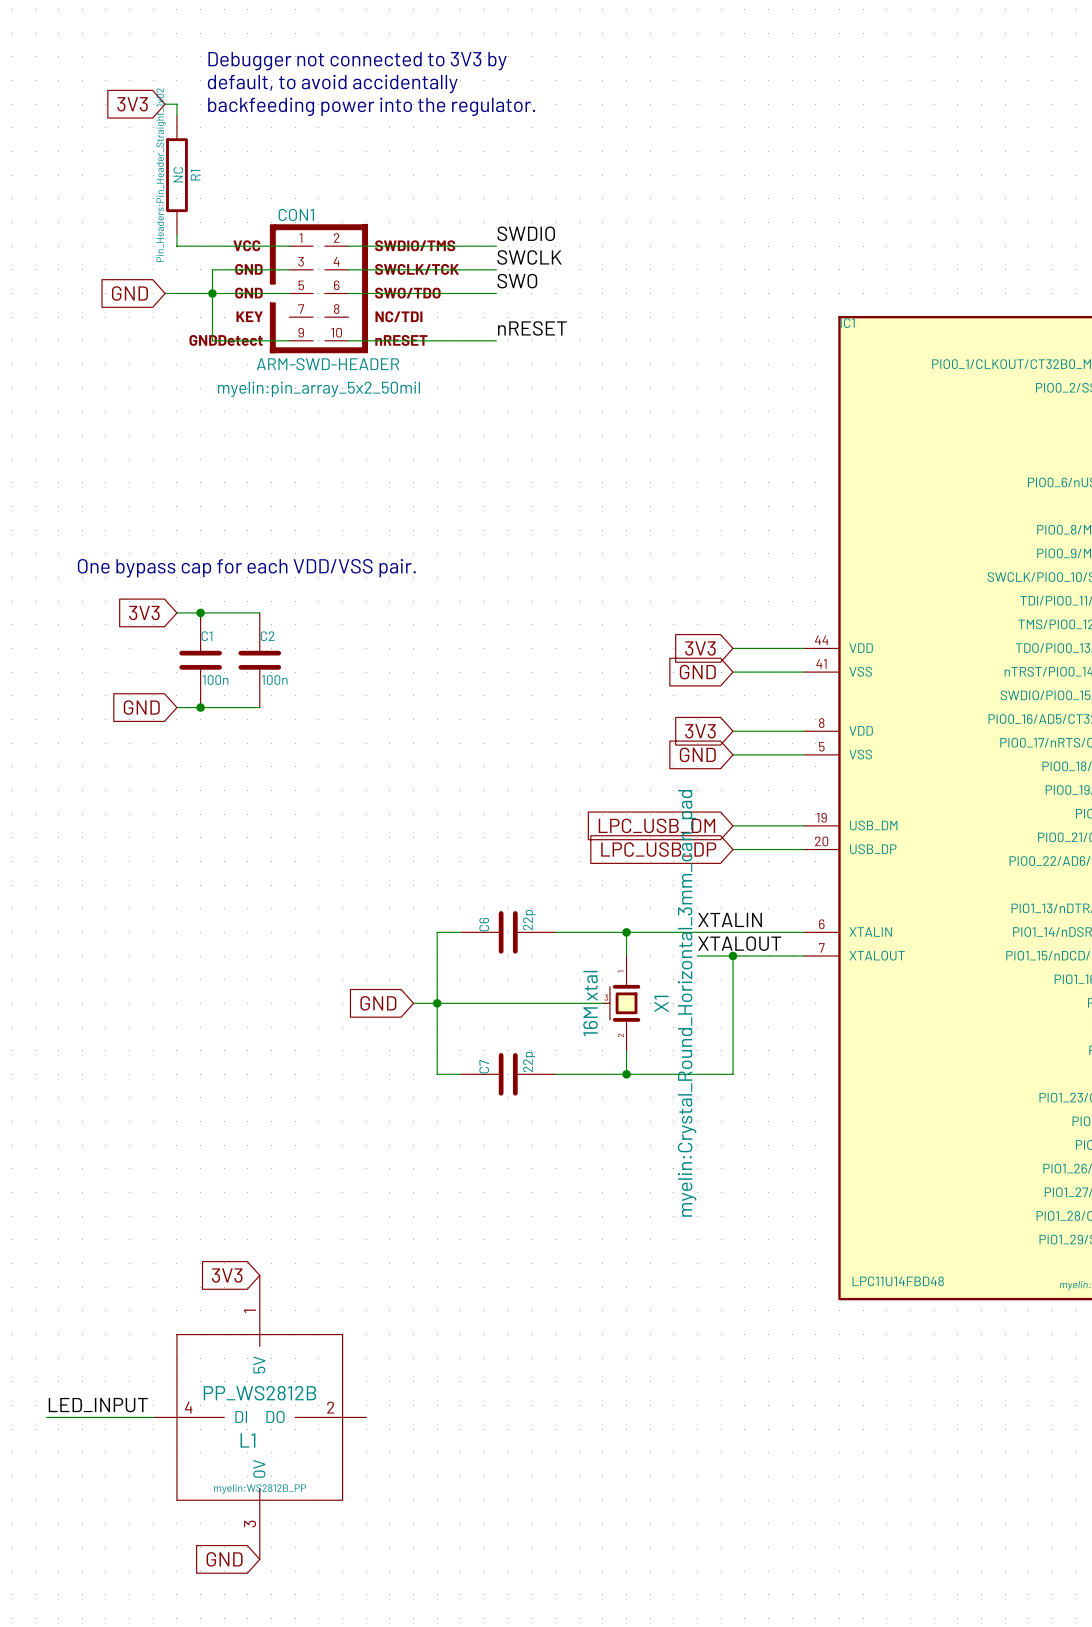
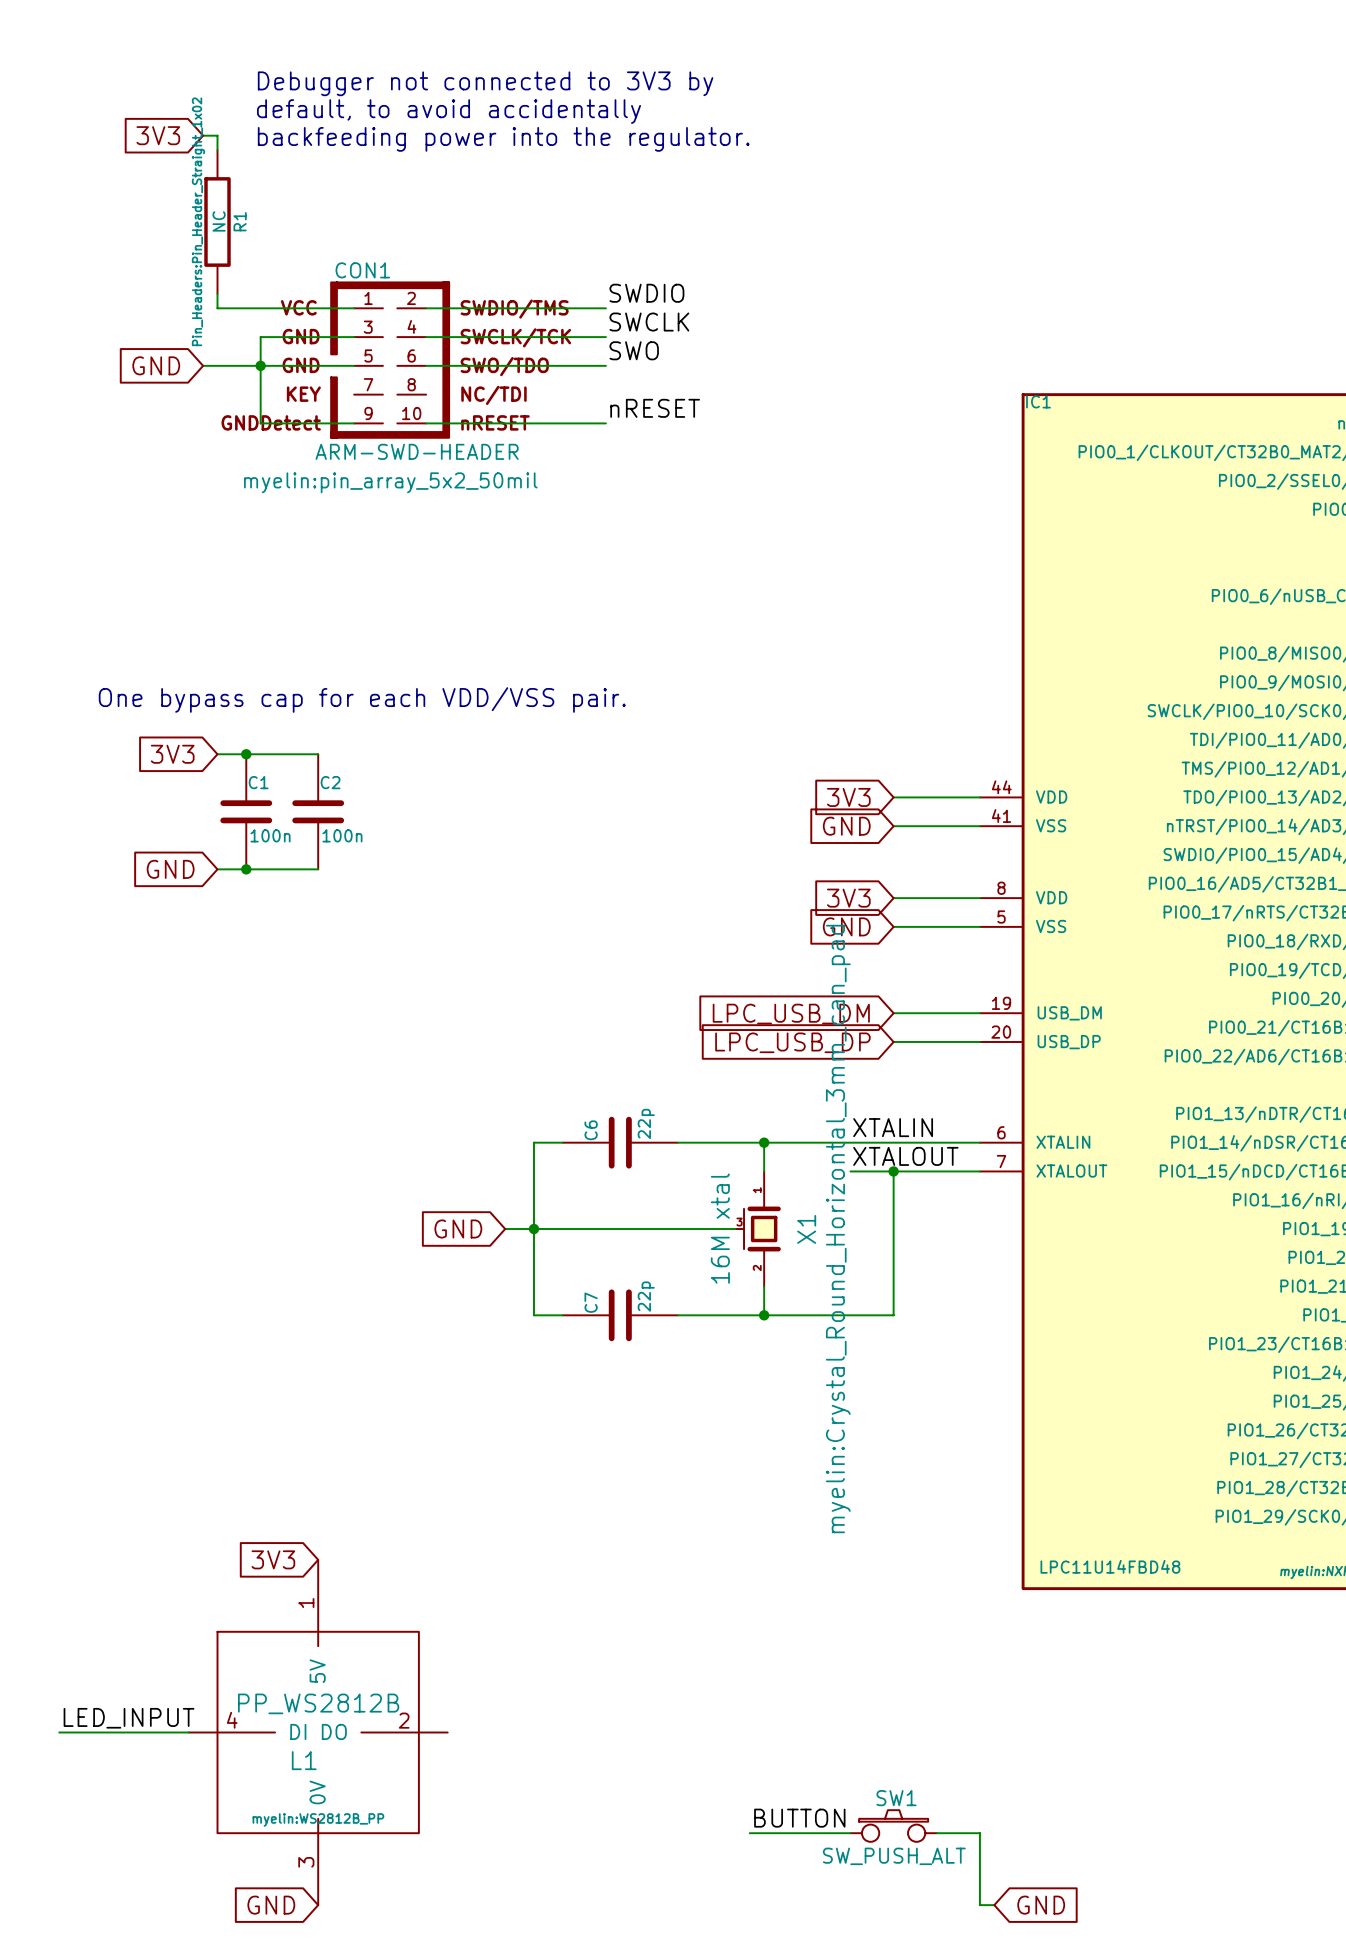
label: none -> BUTTON (799, 1818)
SW1: none -> SW_PUSH_ALT (893, 1826)
wire: none -> (749, 1833) (850, 1833)
wire: none -> (936, 1833) (979, 1833) (979, 1905) (994, 1905)
global label: none -> GND (1041, 1905)

